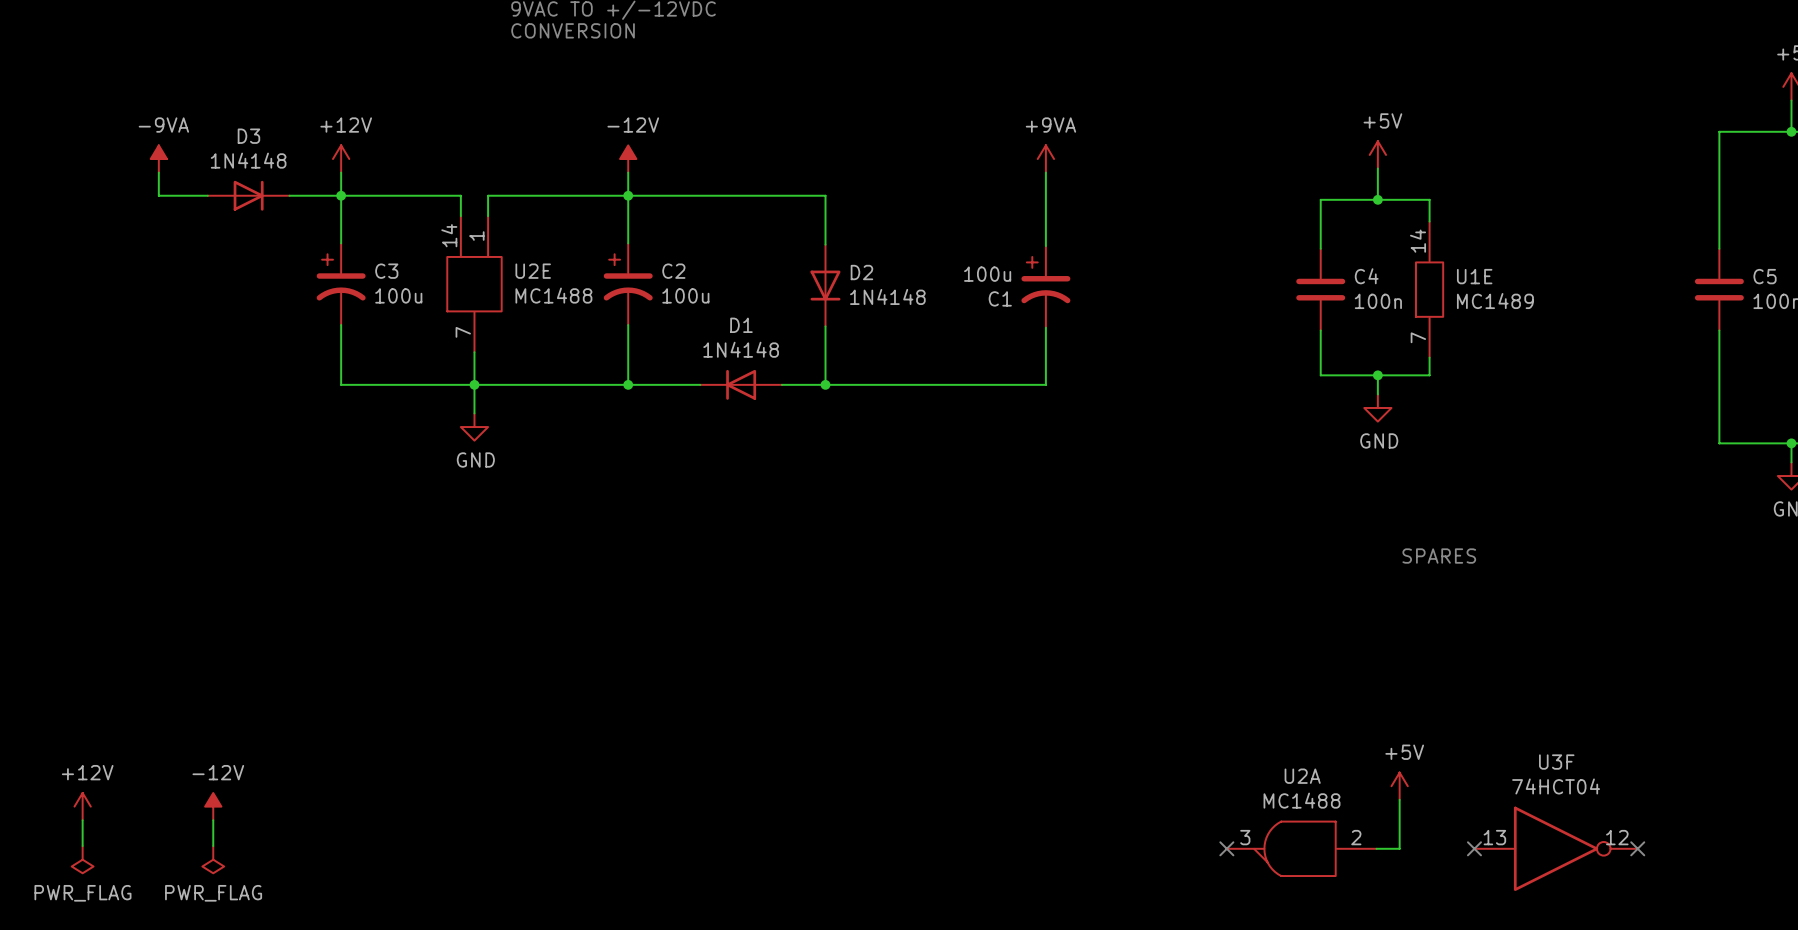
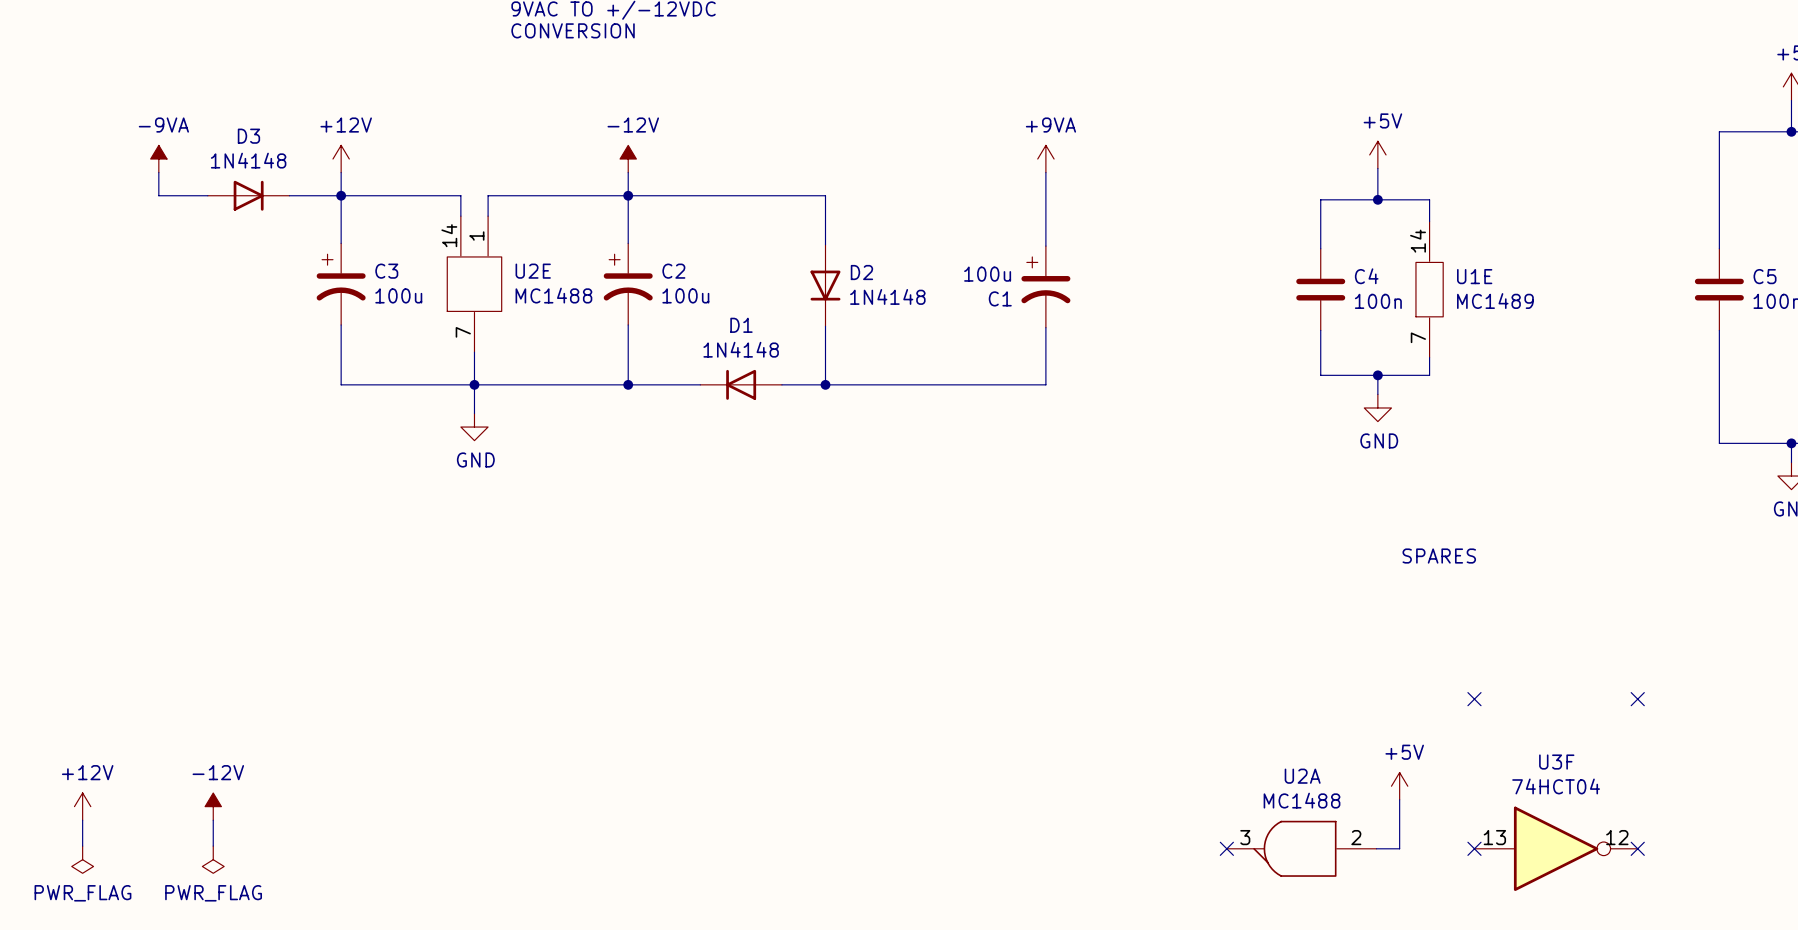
no-connect mark: none -> (1474, 699)
no-connect mark: none -> (1637, 699)

